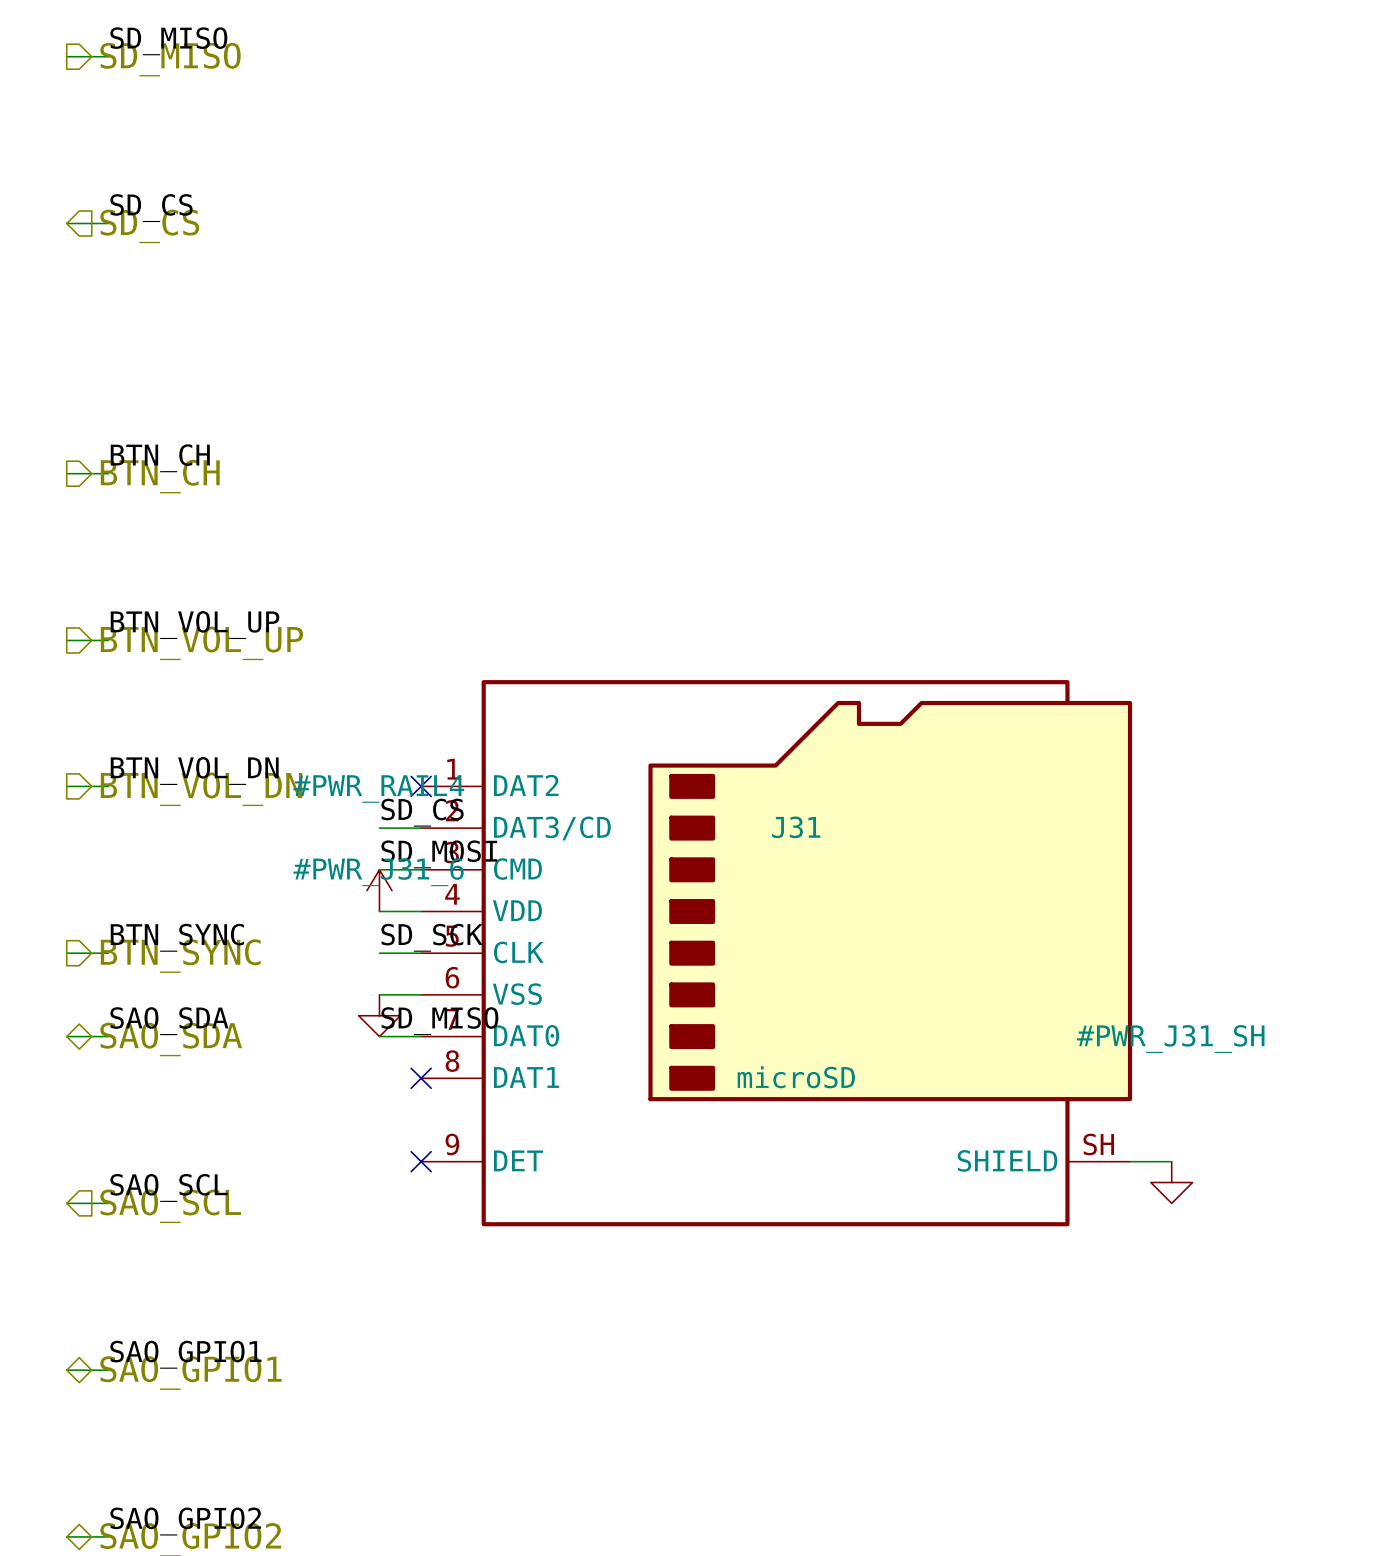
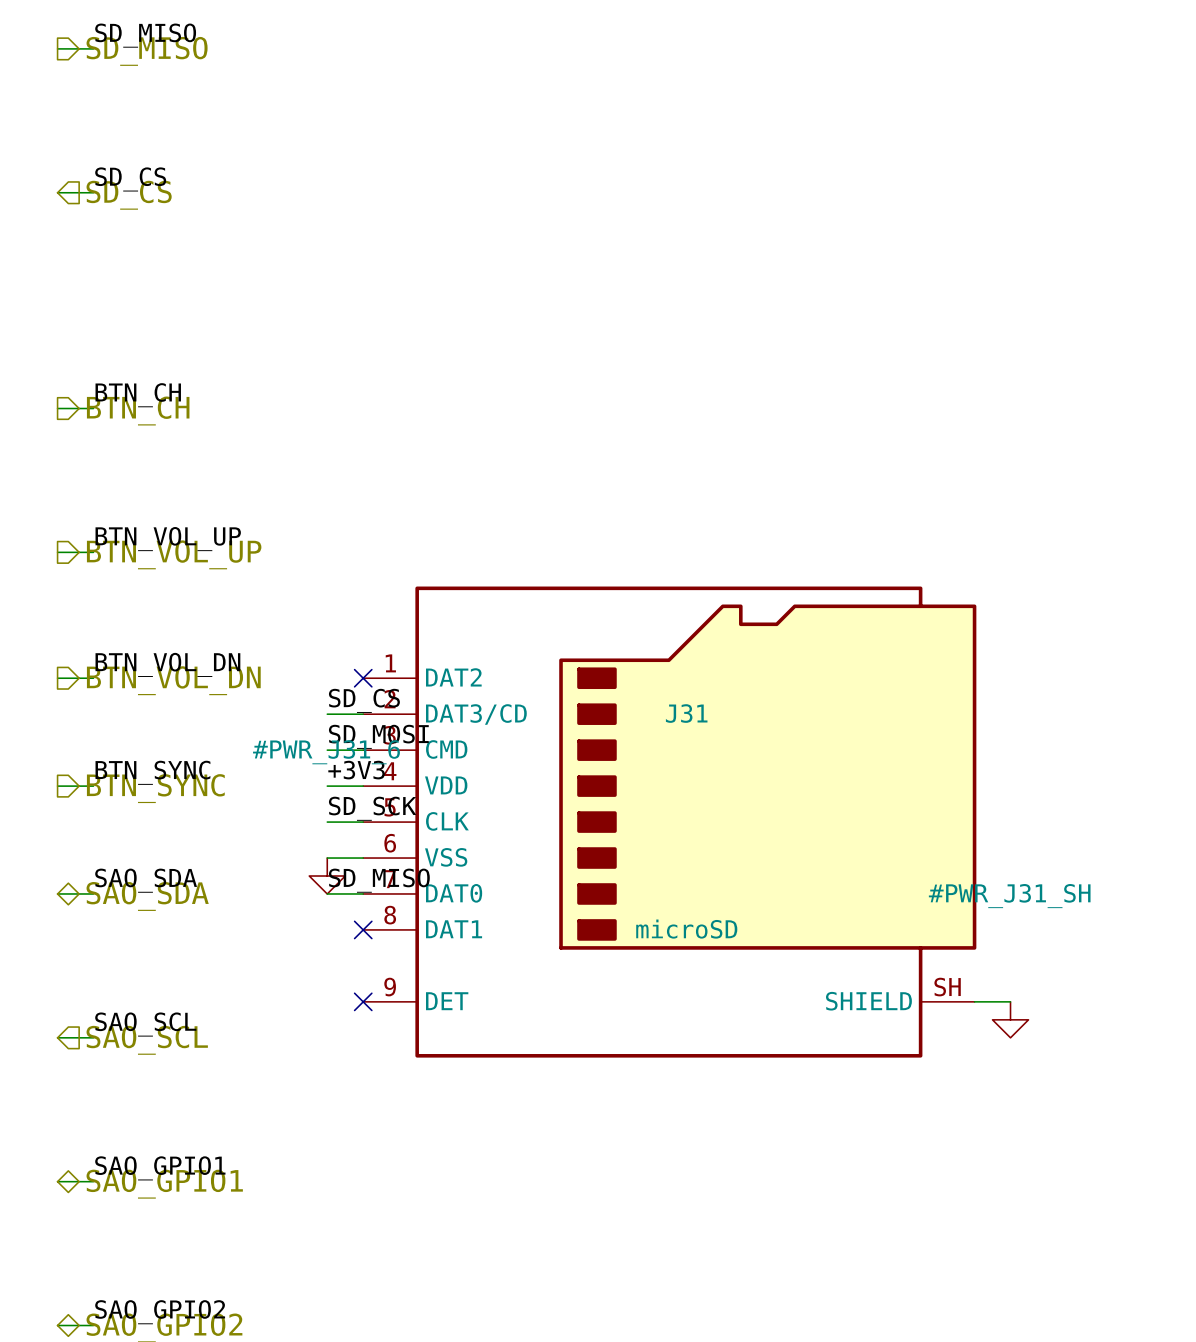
#PWR_RAIL4: (379, 890) -> none
label: none -> +3V3 (356, 770)
label position: BTN_SYNC (177, 937) -> BTN_SYNC (152, 772)
wire: (66, 953) (108, 953) -> (57, 786) (93, 786)
hierarchical label position: BTN_SYNC (180, 956) -> BTN_SYNC (155, 788)

